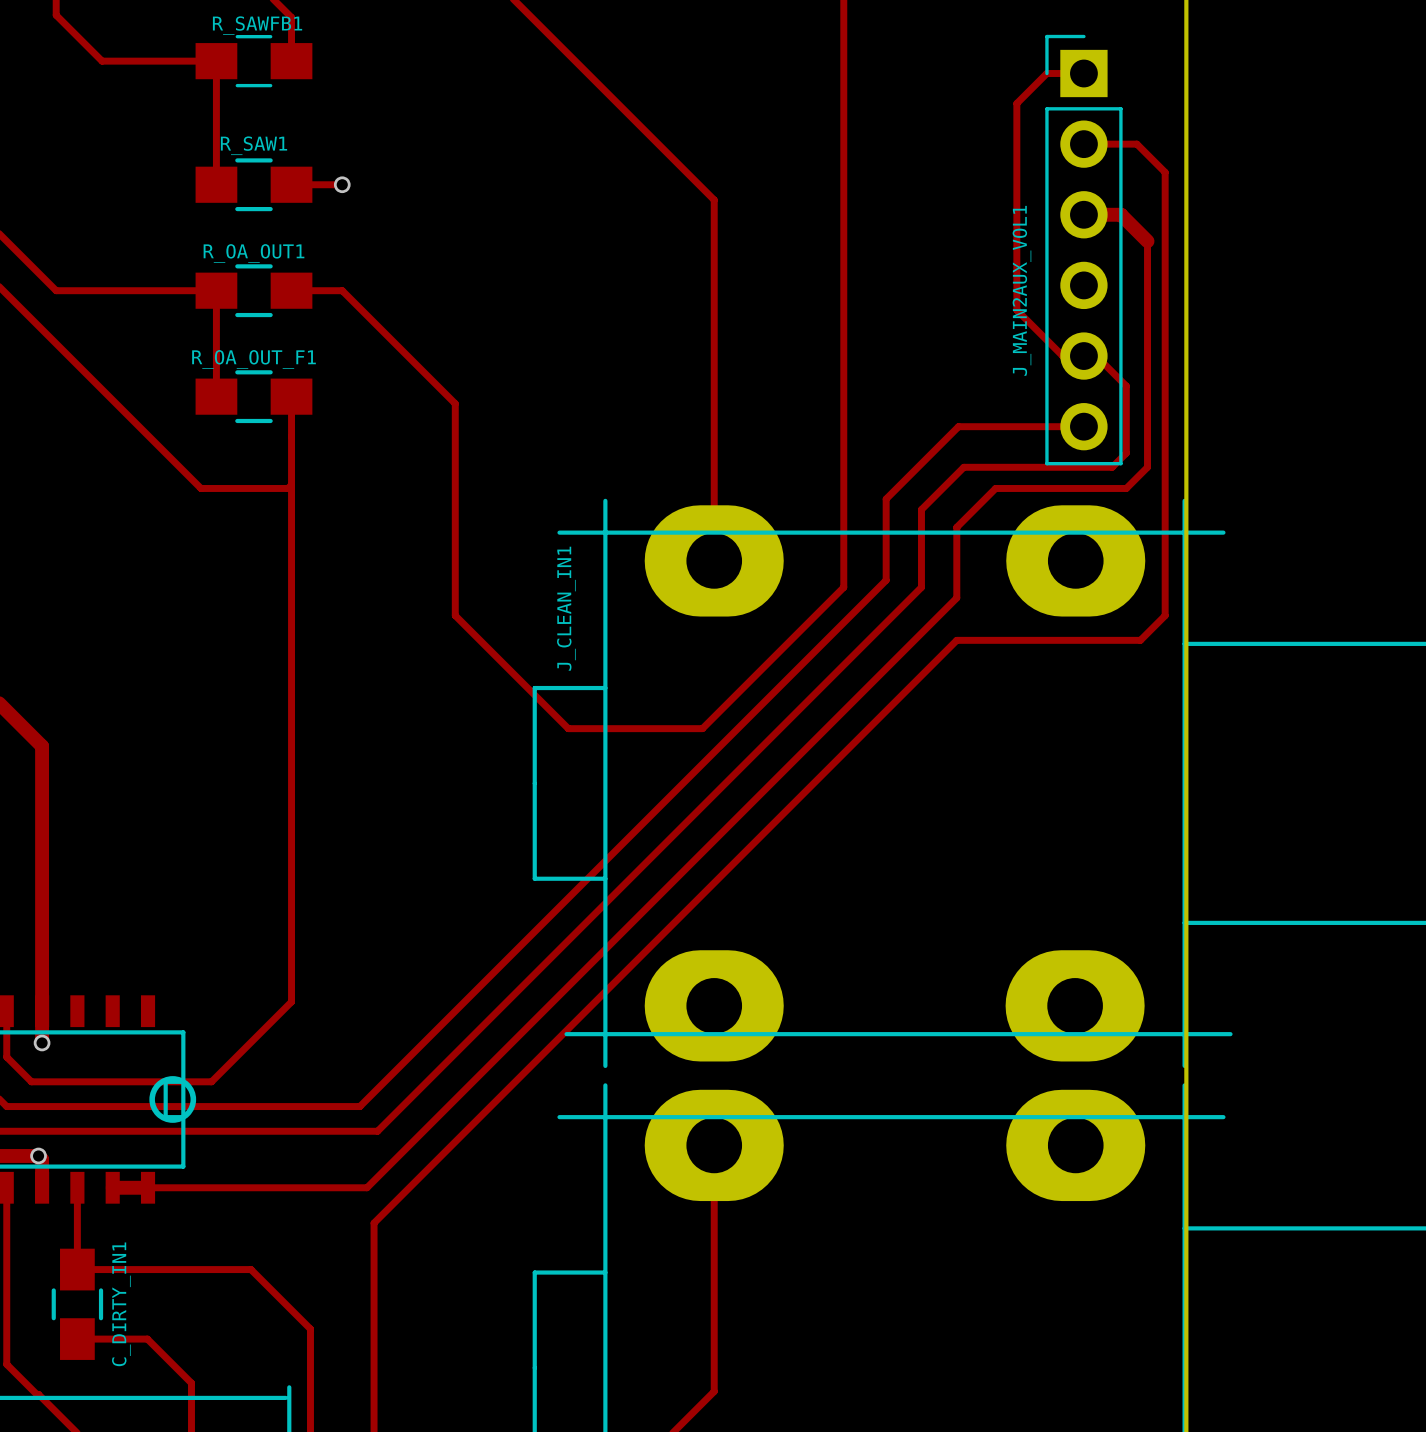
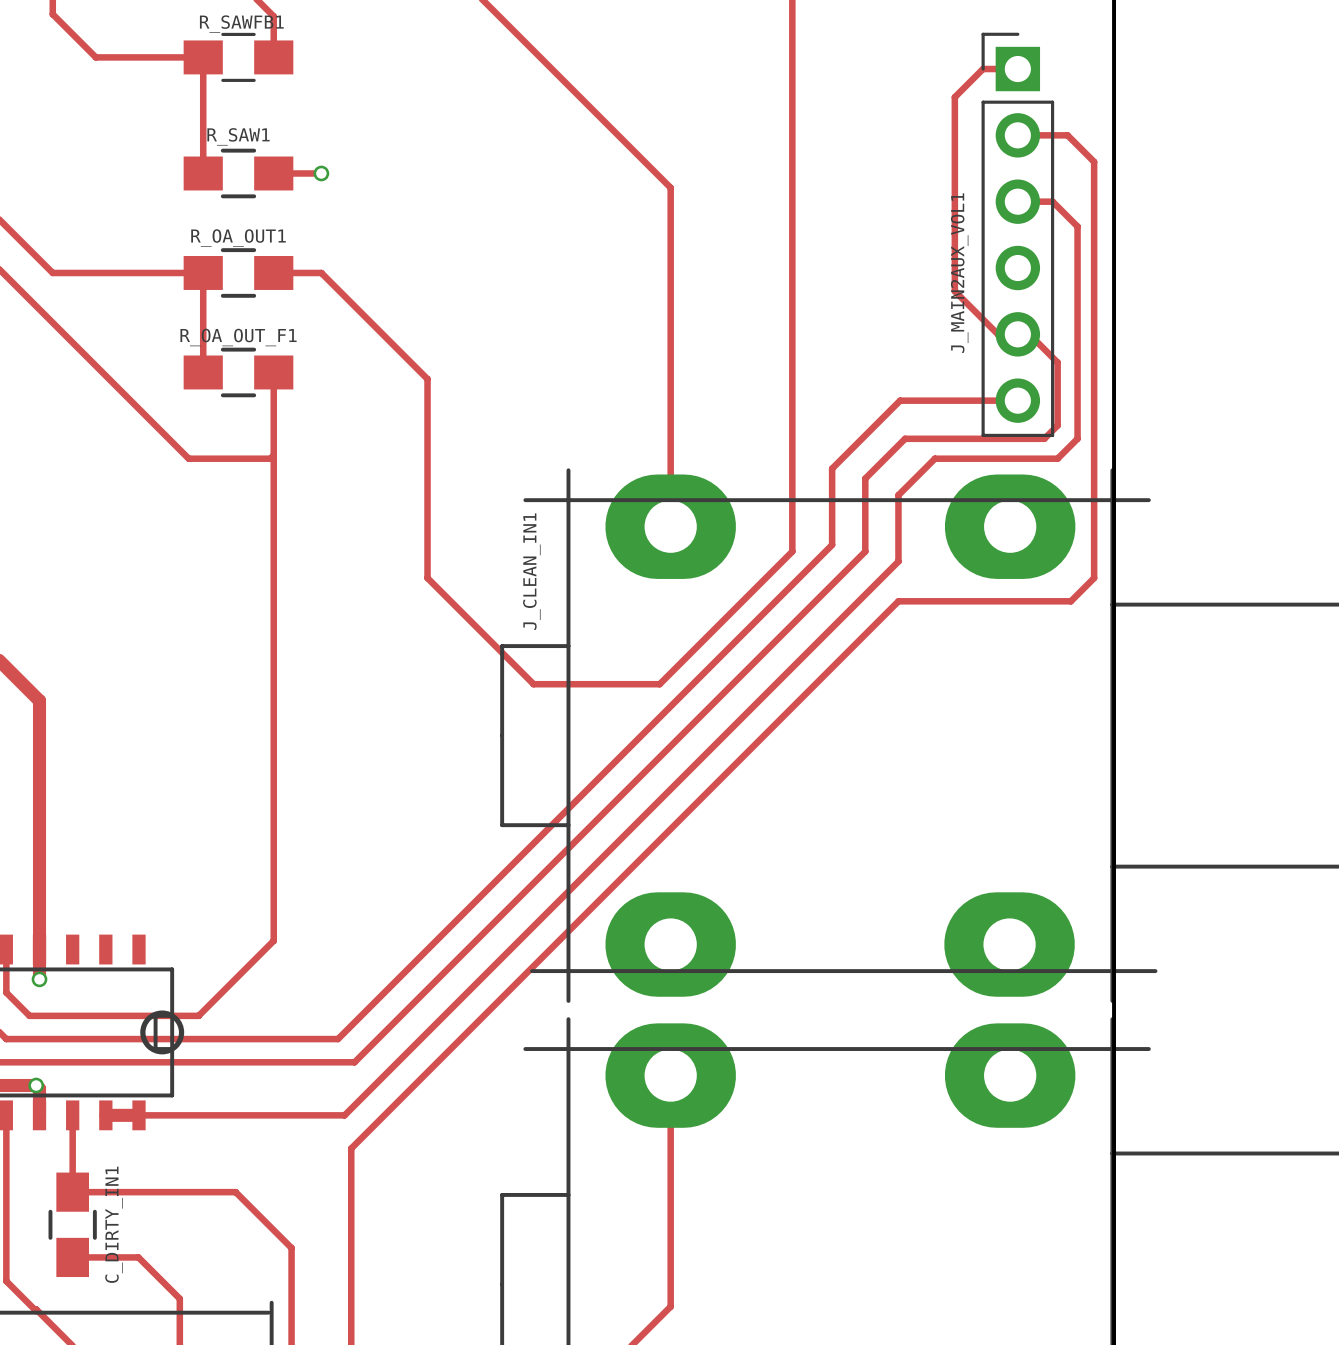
track width: thick (1083, 214) (1121, 214) (1147, 241) -> thin (1017, 201) (1052, 201) (1077, 226)

